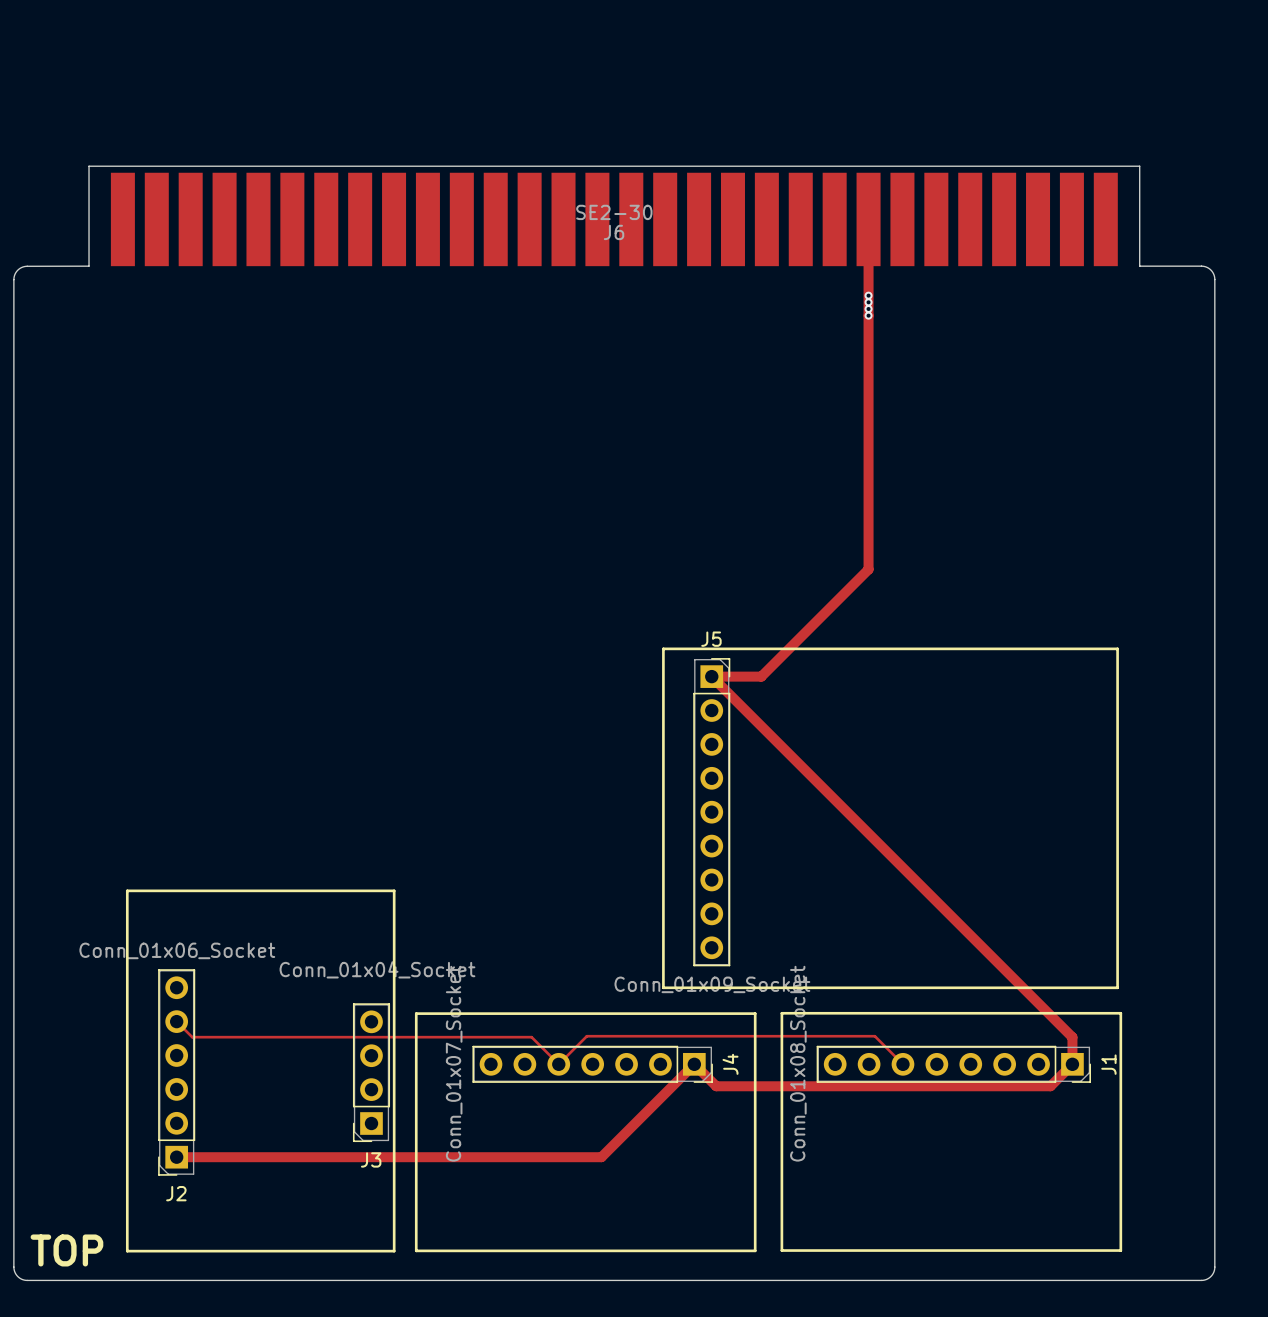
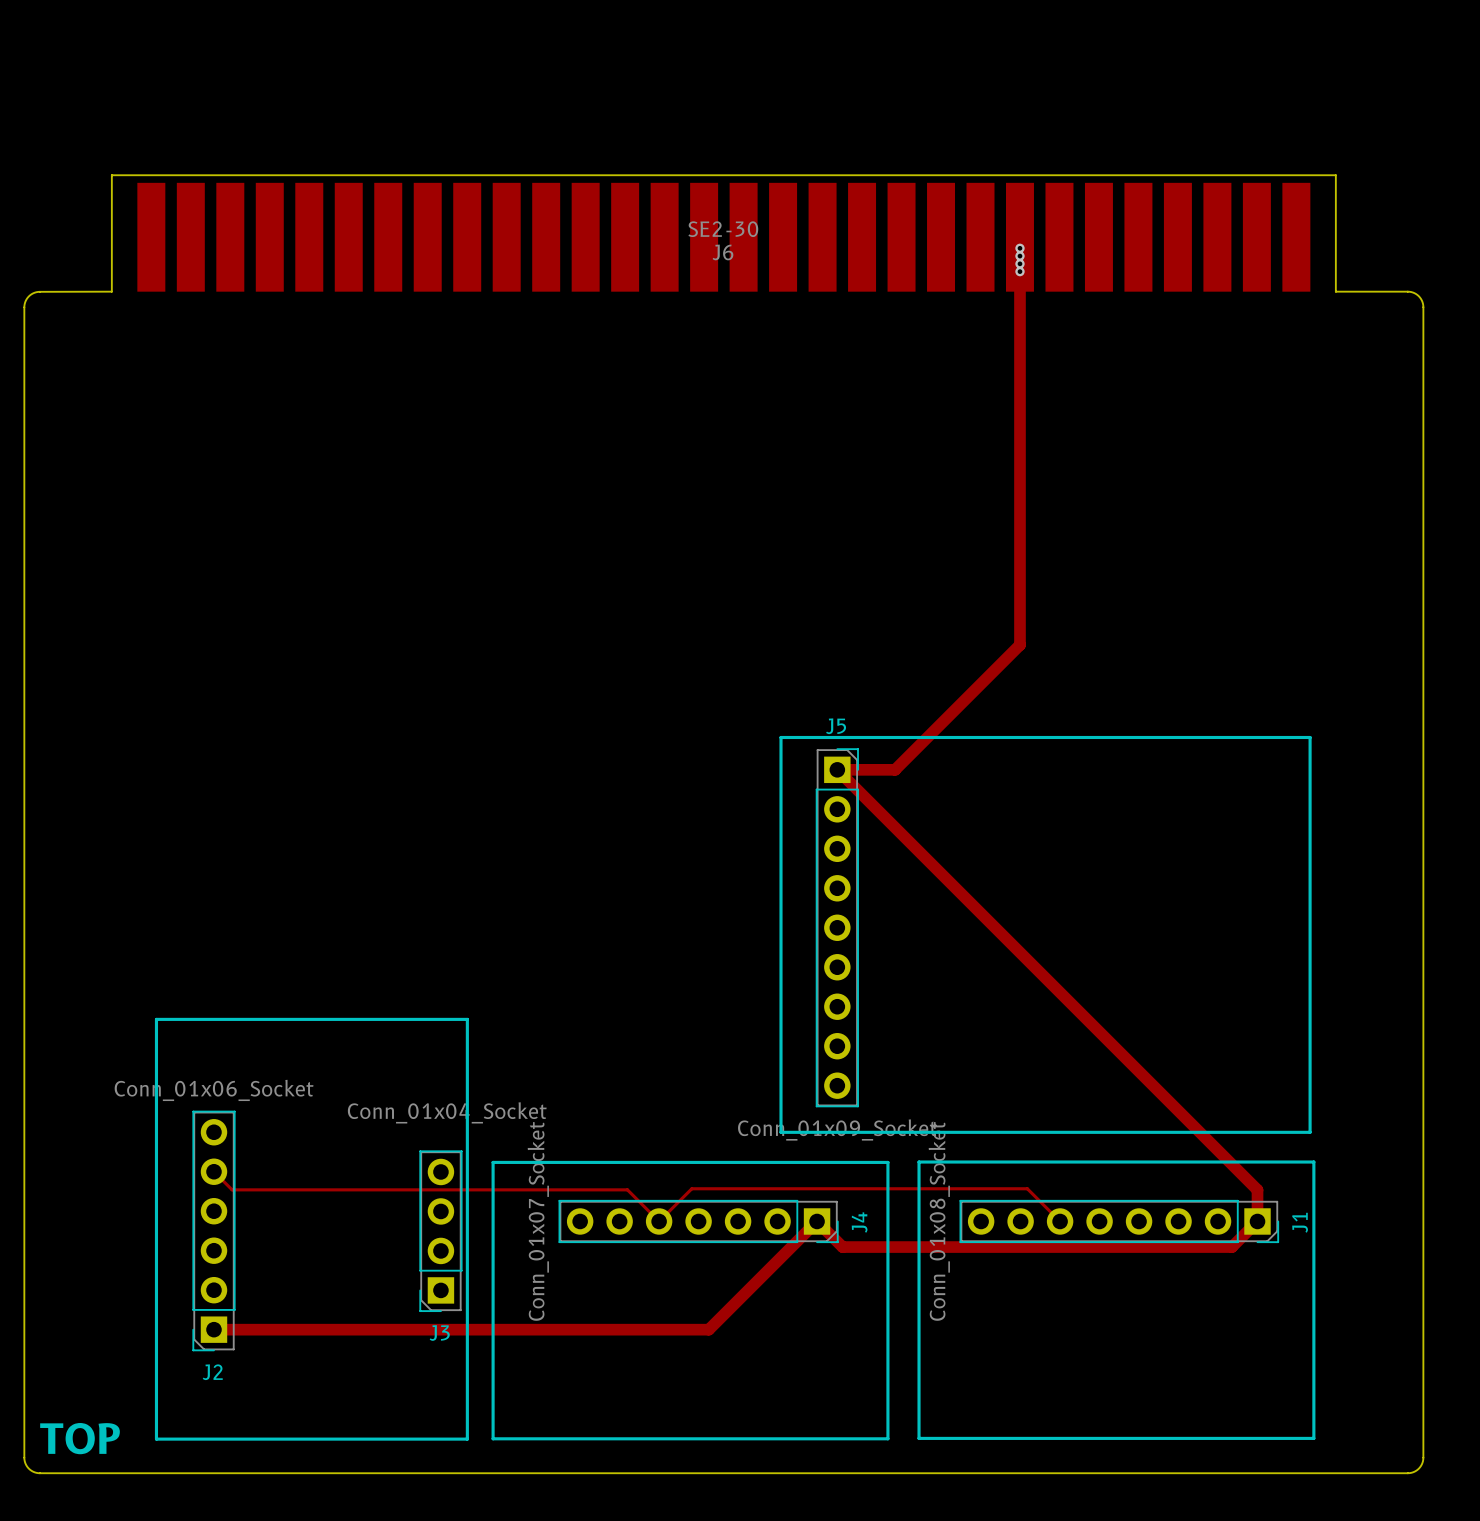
via: none -> (1019, 248)
via: none -> (1019, 256)
via: none -> (1019, 263)
via: none -> (1019, 271)
via: (868, 295) -> none
via: (868, 302) -> none
via: (868, 308) -> none
via: (868, 315) -> none

